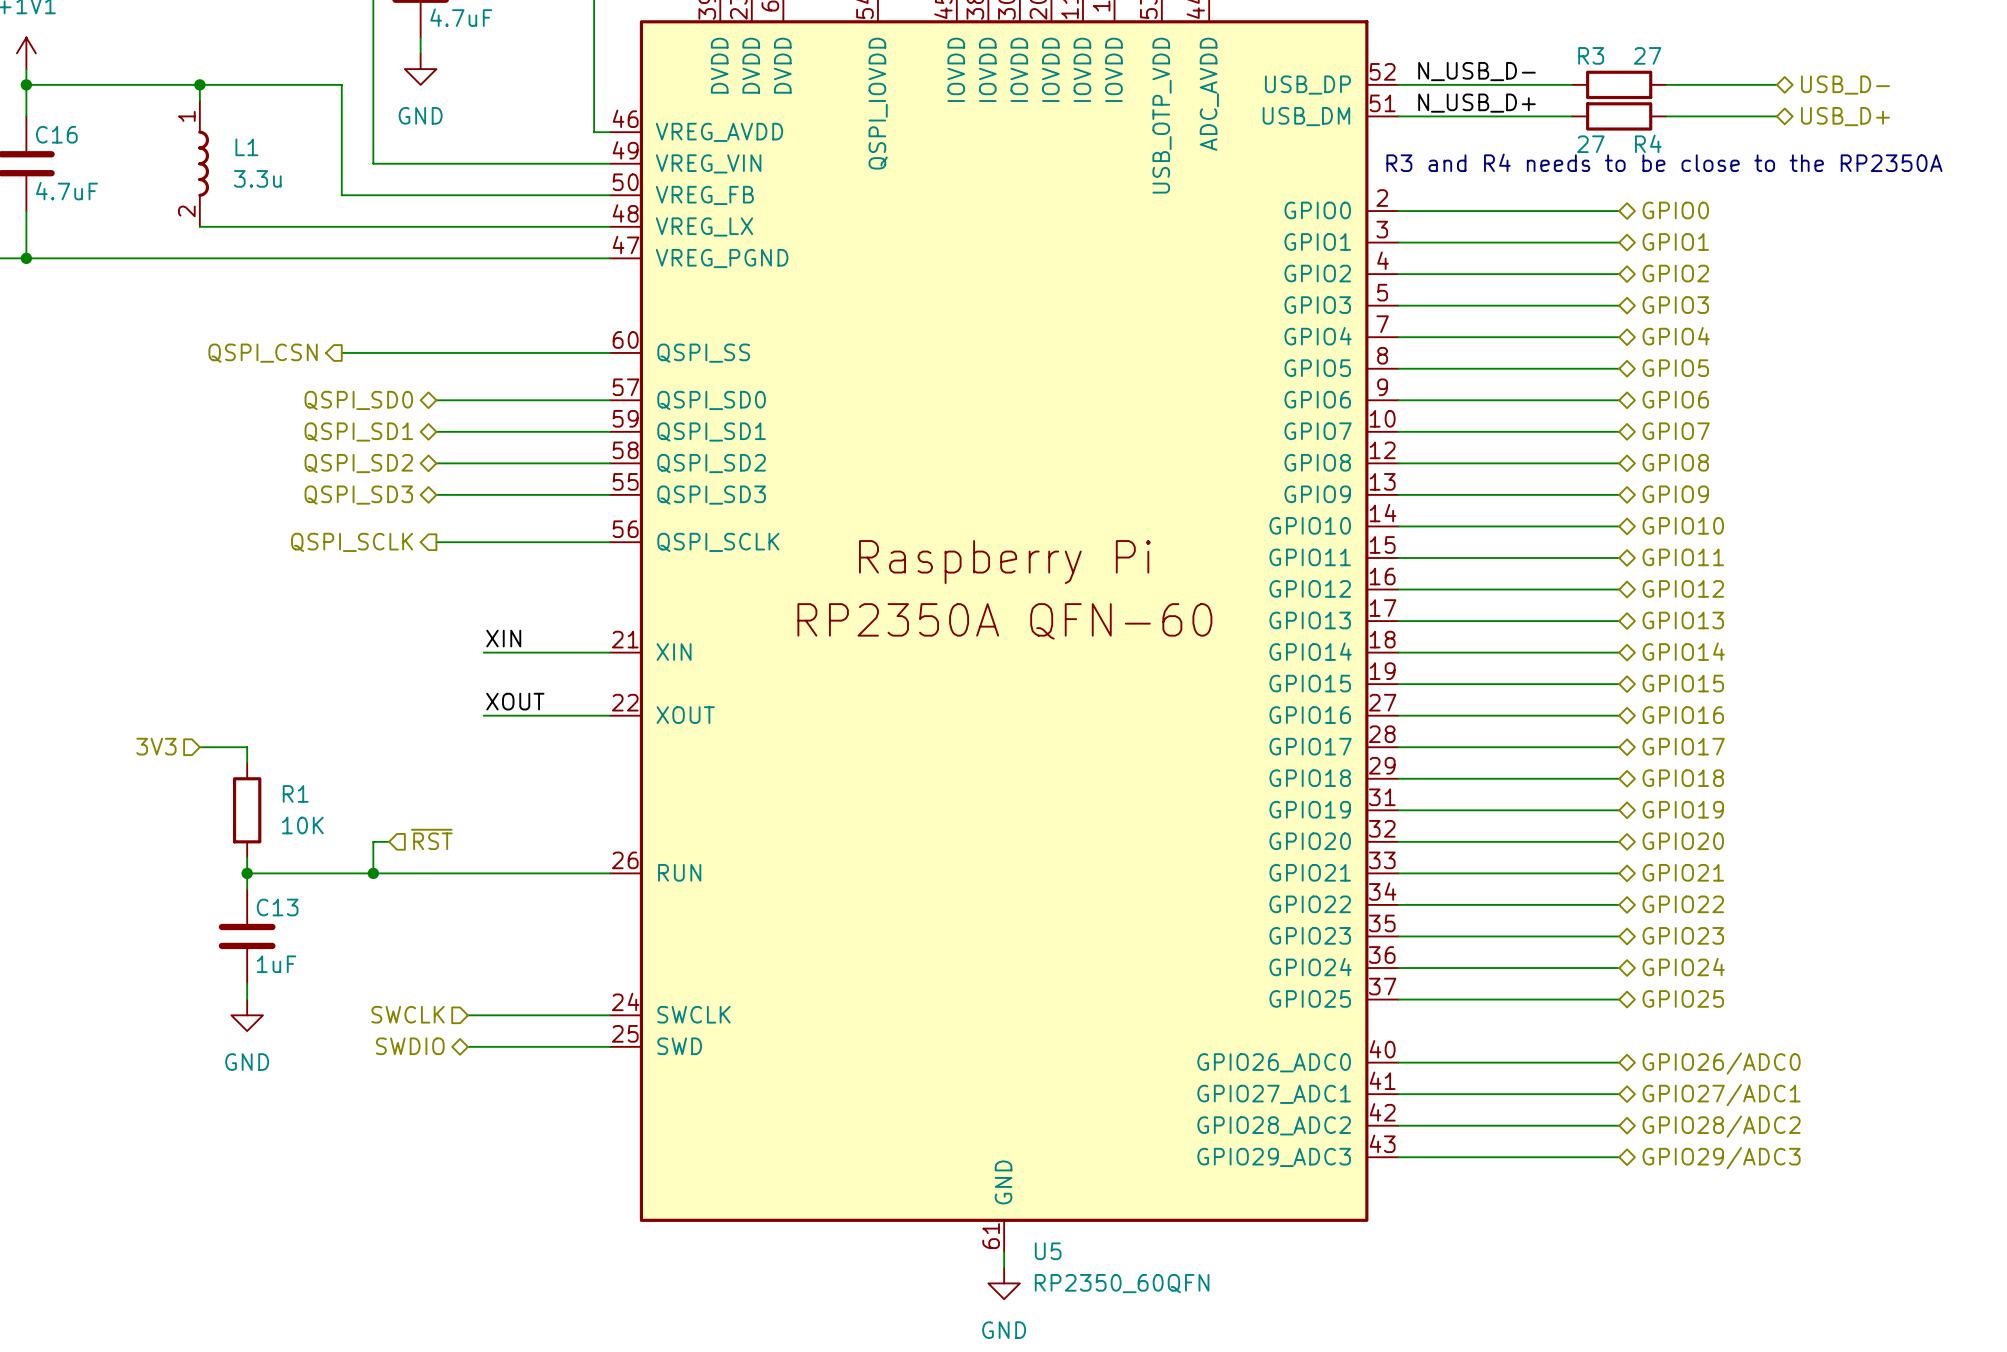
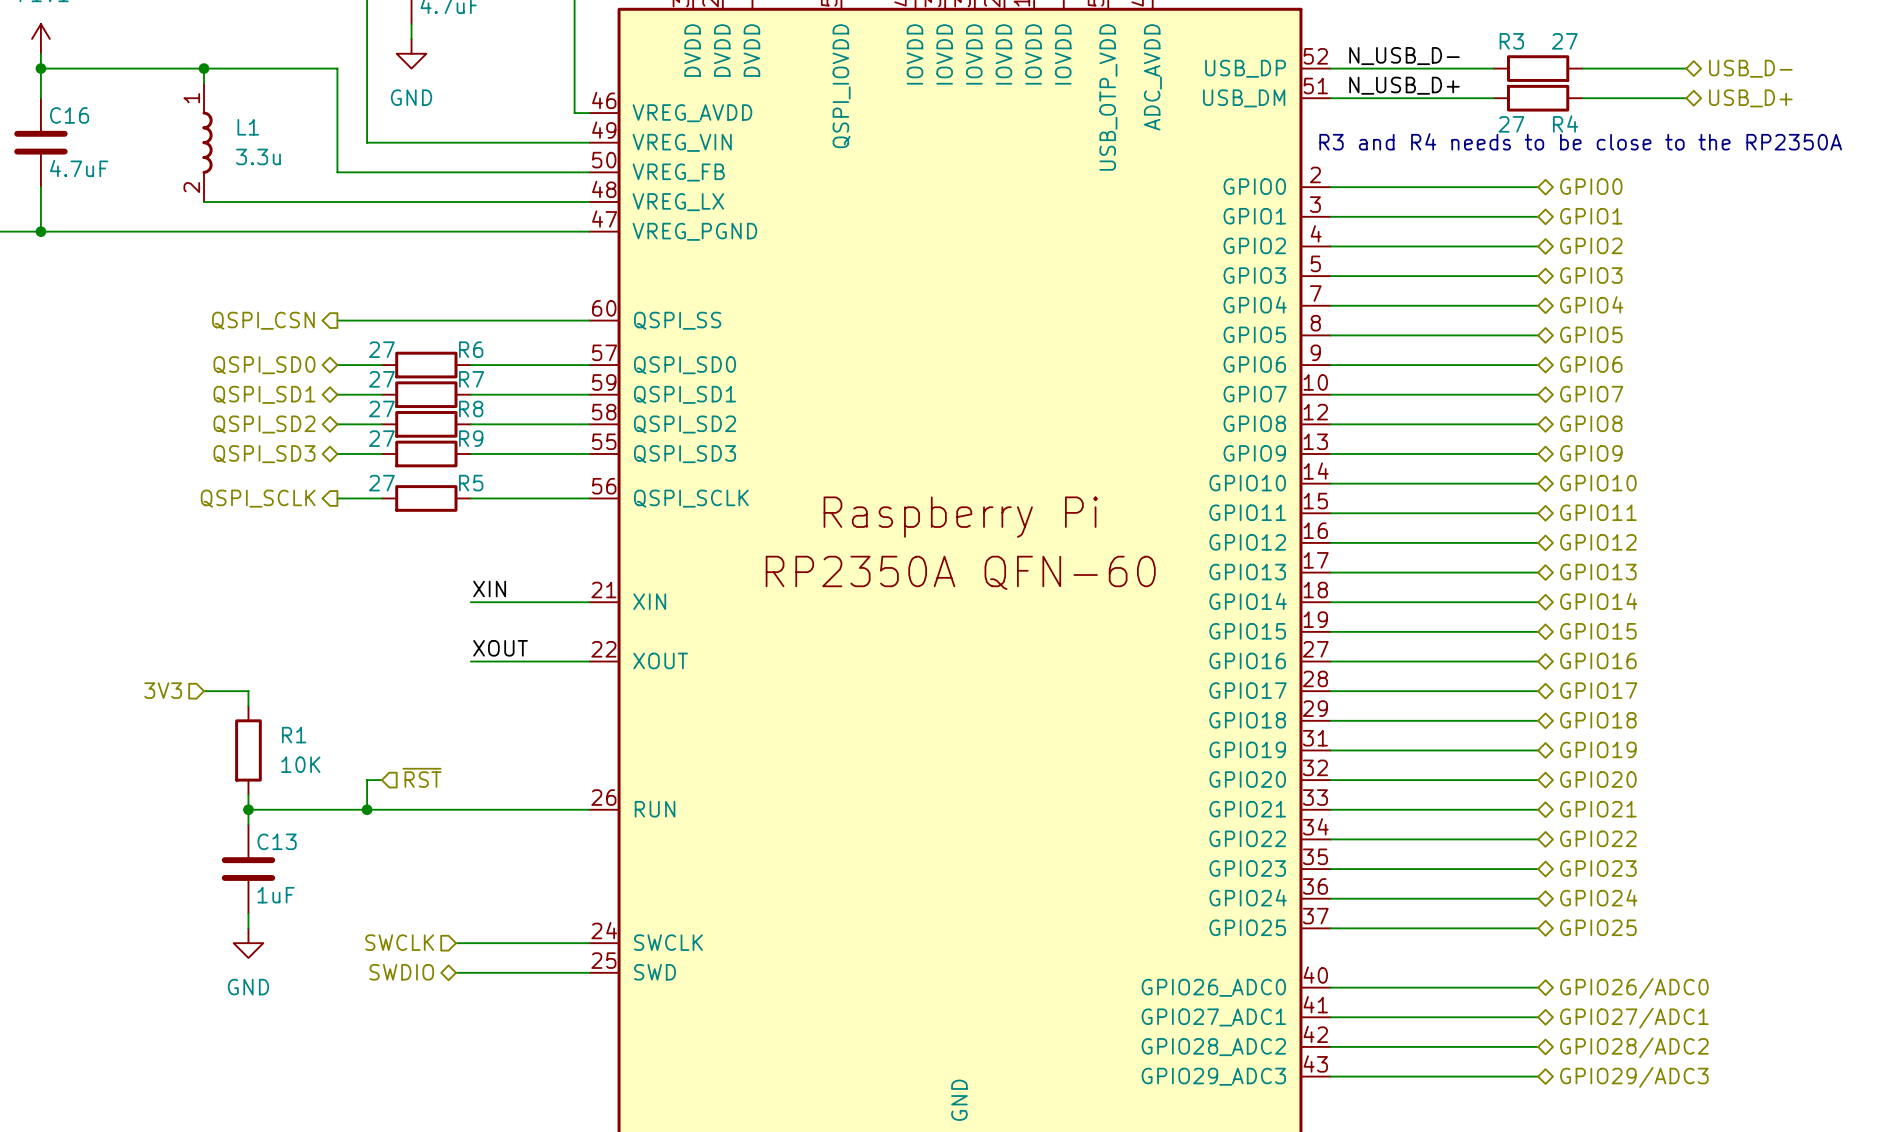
hierarchical label position: QSPI_SD0 (358, 400) -> QSPI_SD0 (264, 365)
wire: (436, 400) (483, 400) -> (337, 365) (381, 365)
R6: none -> 27 (426, 365)
hierarchical label position: QSPI_SD1 (358, 431) -> QSPI_SD1 (264, 394)
wire: (436, 431) (483, 431) -> (337, 394) (381, 394)
R7: none -> 27 (426, 394)
hierarchical label position: QSPI_SD2 (358, 463) -> QSPI_SD2 (264, 424)
wire: (436, 463) (483, 463) -> (337, 424) (381, 424)
R8: none -> 27 (426, 424)
wire: (436, 494) (483, 494) -> (337, 453) (381, 453)
R9: none -> 27 (426, 453)
hierarchical label position: QSPI_SD3 (358, 495) -> QSPI_SD3 (264, 454)
hierarchical label position: QSPI_SCLK (352, 542) -> QSPI_SCLK (258, 498)
wire: (436, 542) (483, 542) -> (337, 498) (381, 498)
R5: none -> 27 (426, 498)

